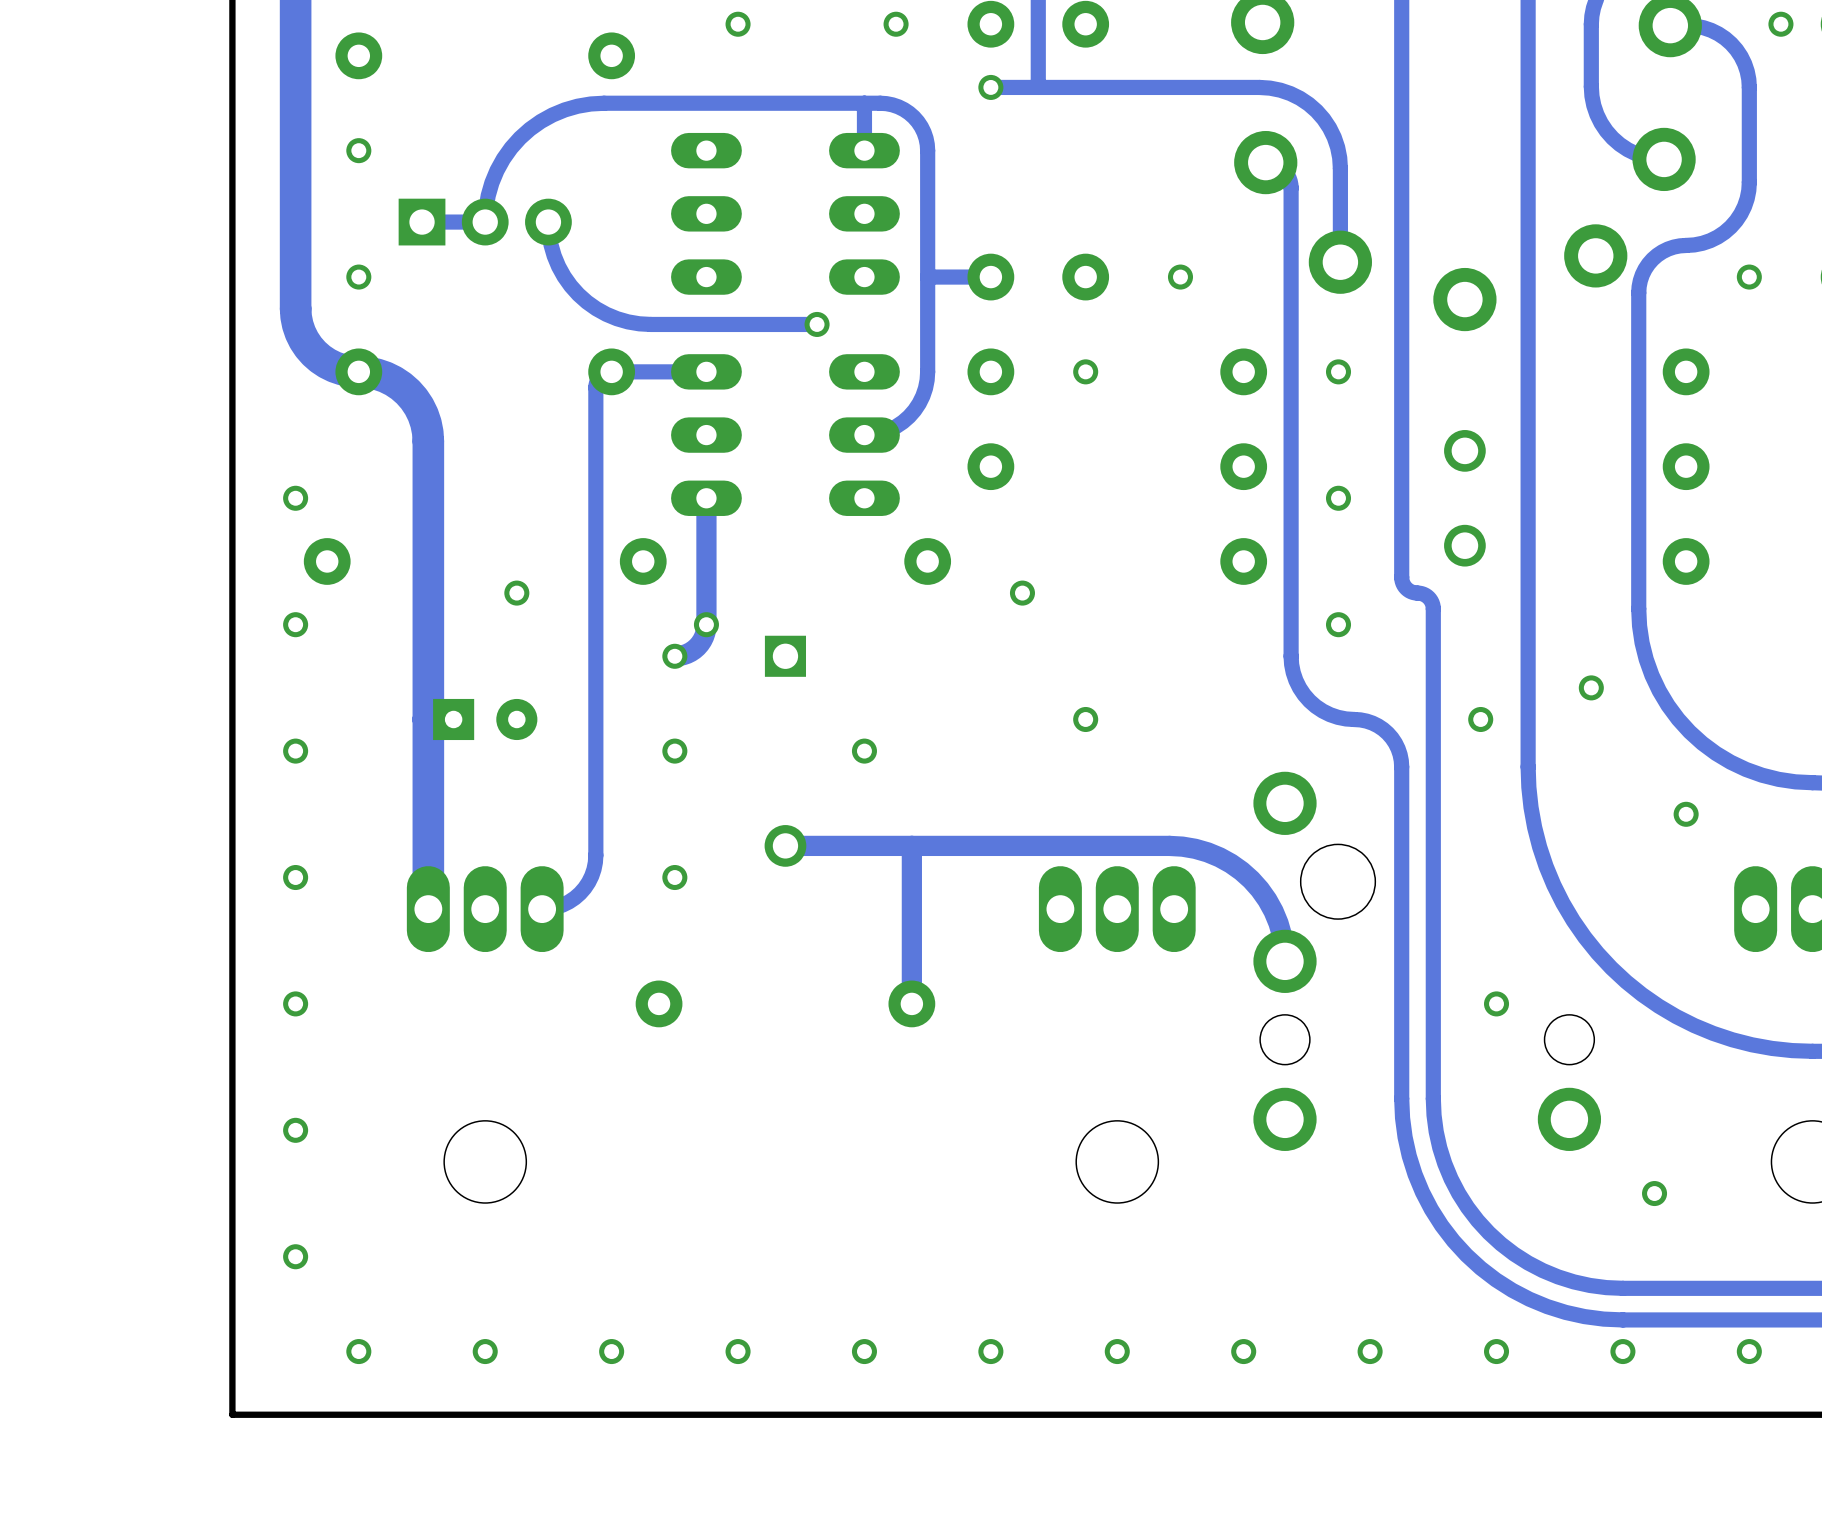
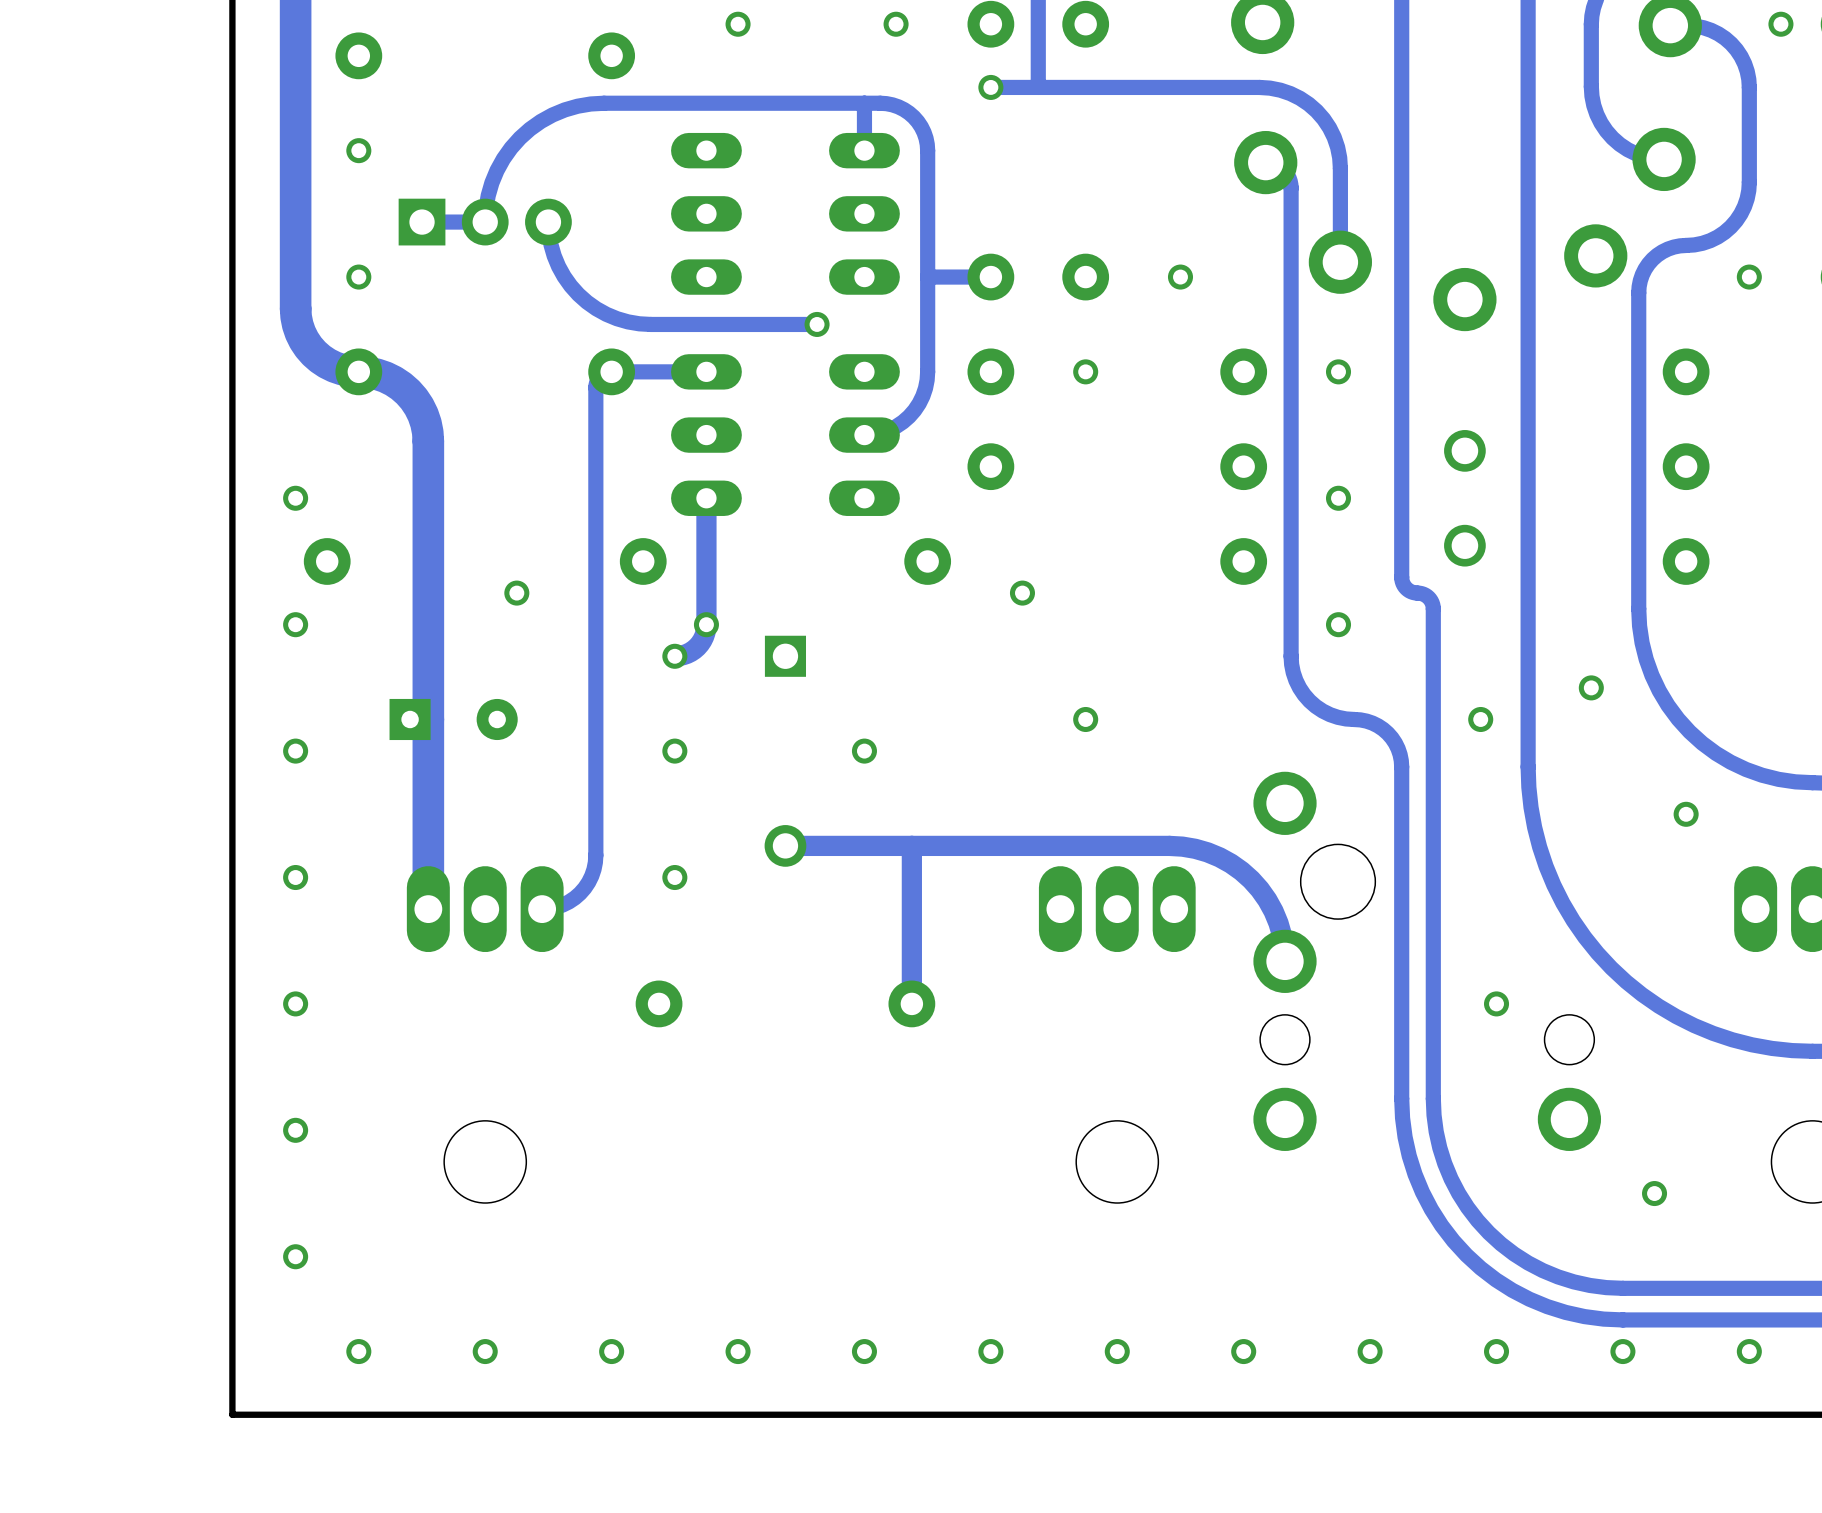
part: none -> (453, 719)
part: (485, 719) -> none

